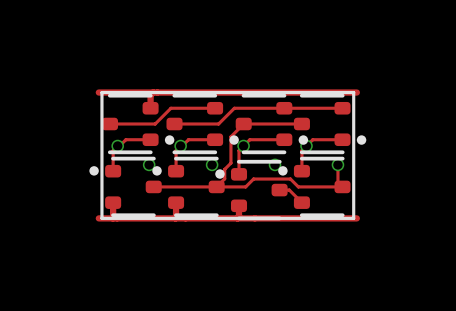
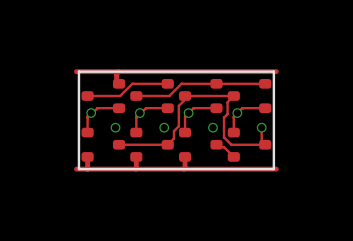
part footprint: [101, 93, 175, 155] -> [81, 78, 126, 114]
part footprint: [166, 93, 239, 155] -> [130, 78, 174, 114]
part footprint: [235, 93, 309, 155] -> [178, 78, 223, 114]
part footprint: [293, 93, 367, 155] -> [227, 78, 272, 114]
part footprint: [89, 156, 162, 218] -> [81, 127, 126, 162]
part footprint: [152, 156, 225, 218] -> [130, 127, 174, 162]
part footprint: [278, 156, 351, 218] -> [227, 127, 272, 162]
part footprint: [215, 159, 288, 221] -> [178, 127, 223, 162]
top track: (216, 186) (245, 186) (253, 179) (290, 179) (298, 186) -> (233, 96) (227, 102) (227, 114) (224, 117) (224, 137) (231, 144)

